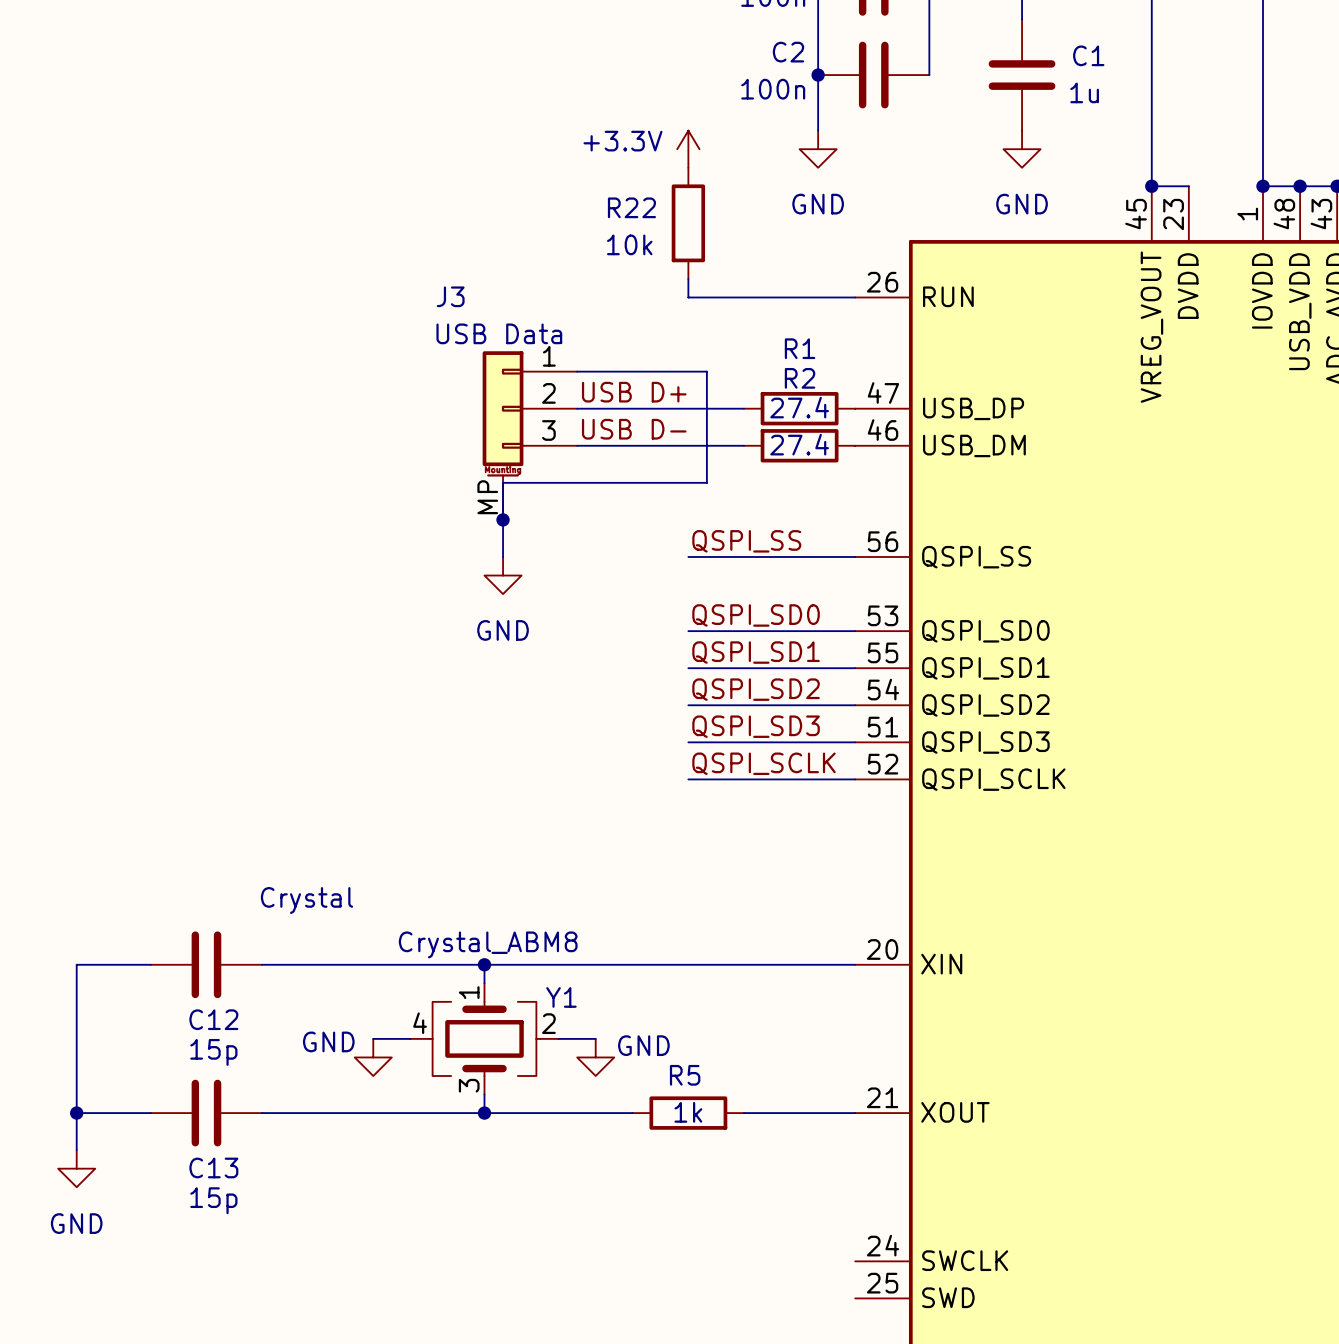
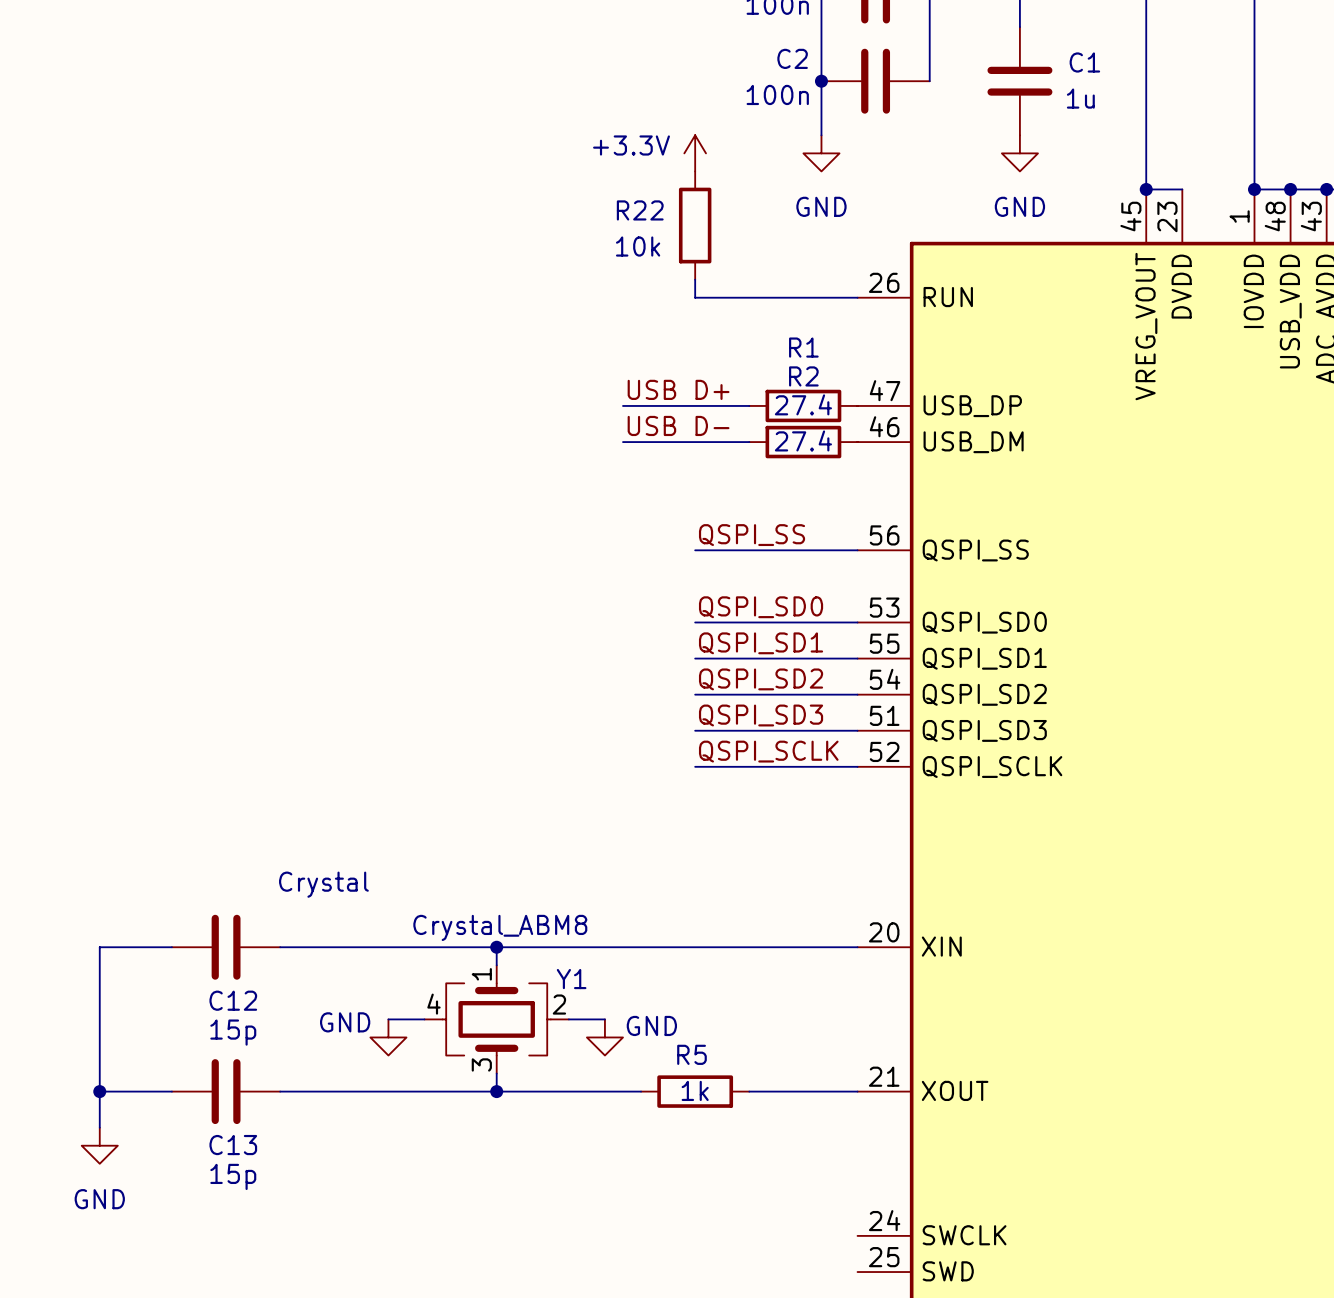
wire: (577, 371) (706, 371) (706, 482) (503, 482) (503, 556) -> none
label position: USB D+ (634, 392) -> USB D+ (678, 389)
wire: (577, 408) (614, 408) -> none
label position: USB D- (634, 429) -> USB D- (678, 425)
J3: USB Data (529, 435) -> none
wire: (577, 445) (614, 445) -> none
junction: (503, 519) -> none
power symbol: GND (503, 575) -> none

